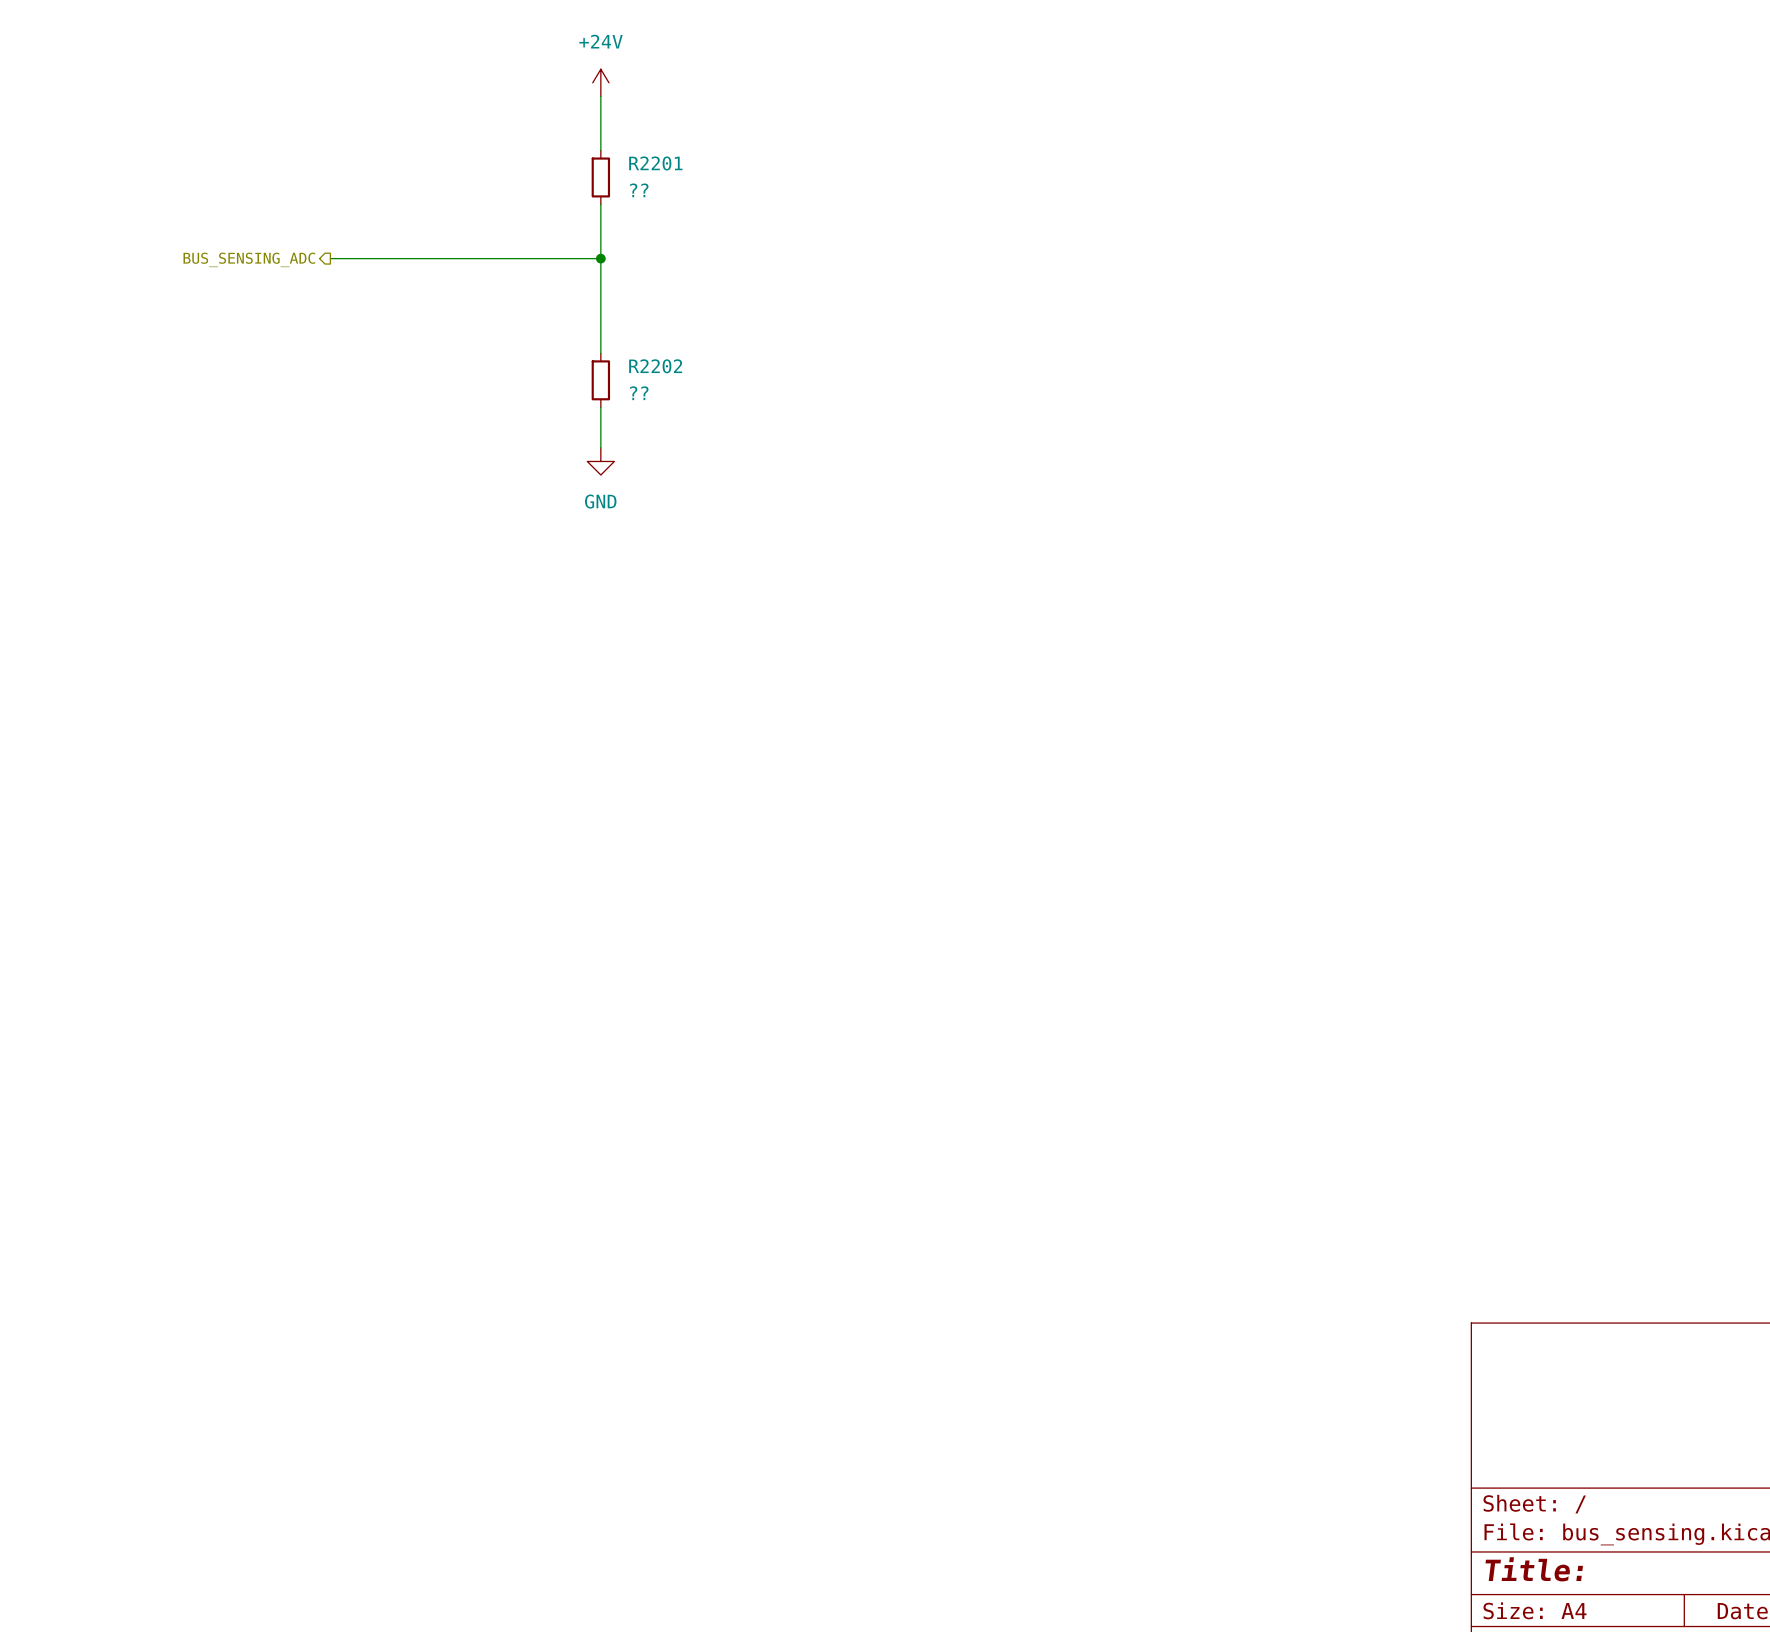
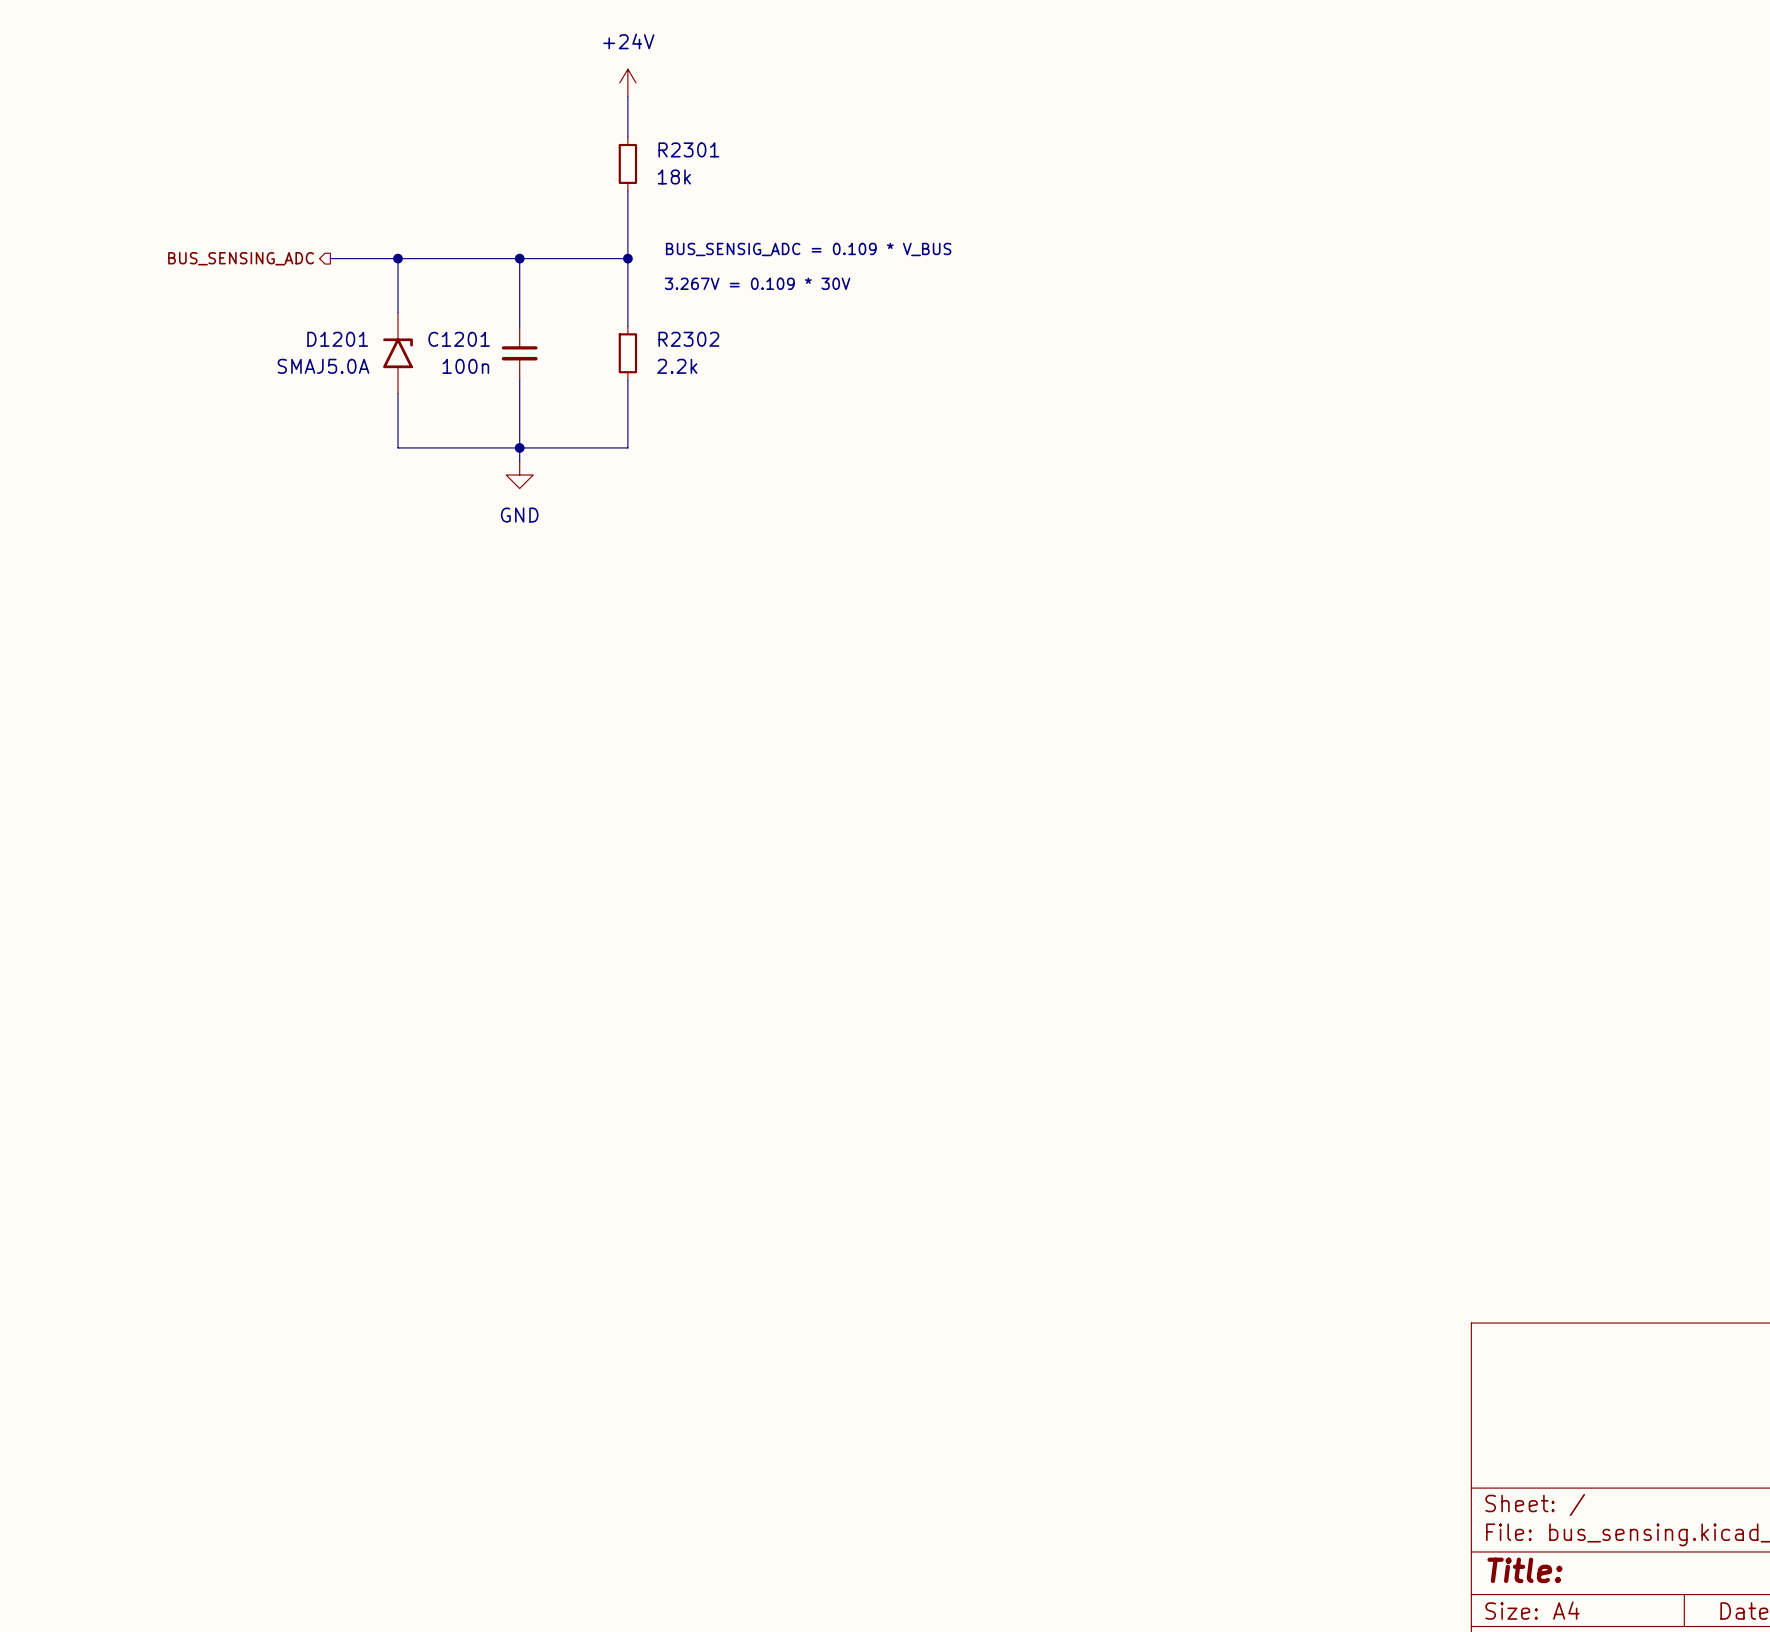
power symbol position: +24V (600, 82) -> +24V (627, 82)
wire: (600, 96) (600, 150) -> (398, 258) (398, 312)
wire: none -> (627, 96) (627, 136)
R2301: none -> 18k (627, 163)
R2201: ?? (600, 177) -> none
wire: none -> (627, 191) (627, 326)
wire: (600, 204) (600, 353) -> none
text: none -> BUS_SENSIG_ADC = 0.109 * V_BUS (808, 249)
junction: none -> (398, 258)
wire: none -> (519, 258) (519, 326)
junction: none -> (519, 258)
wire: none -> (600, 258) (627, 258)
junction position: (600, 258) -> (627, 258)
text: none -> 3.267V = 0.109 * 30V (757, 283)
D1201: none -> SMAJ5.0A (398, 353)
C1201: none -> 100n (519, 353)
R2302: none -> 2.2k (627, 353)
wire: none -> (519, 380) (519, 461)
R2202: ?? (600, 380) -> none
wire: none -> (627, 380) (627, 447) (398, 447) (398, 393)
wire: (600, 407) (600, 447) -> none
junction: none -> (519, 447)
power symbol position: GND (600, 461) -> GND (519, 475)

